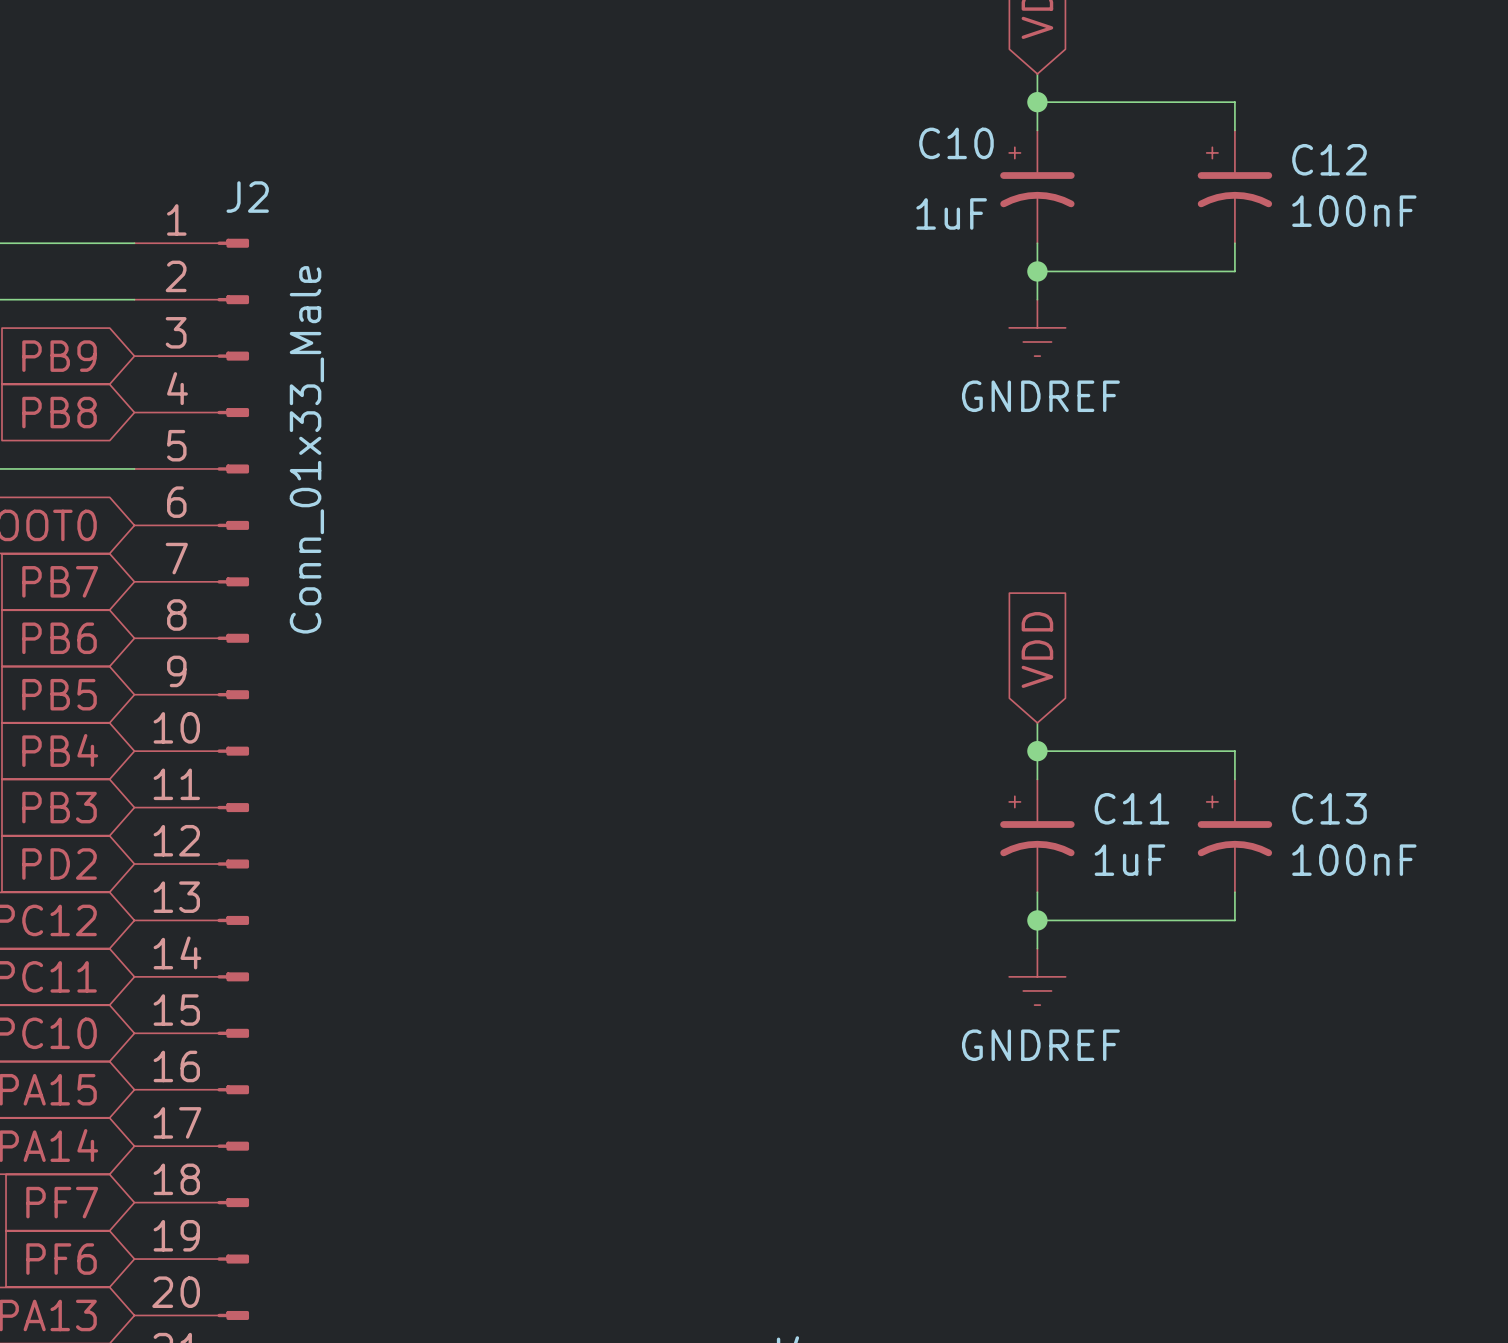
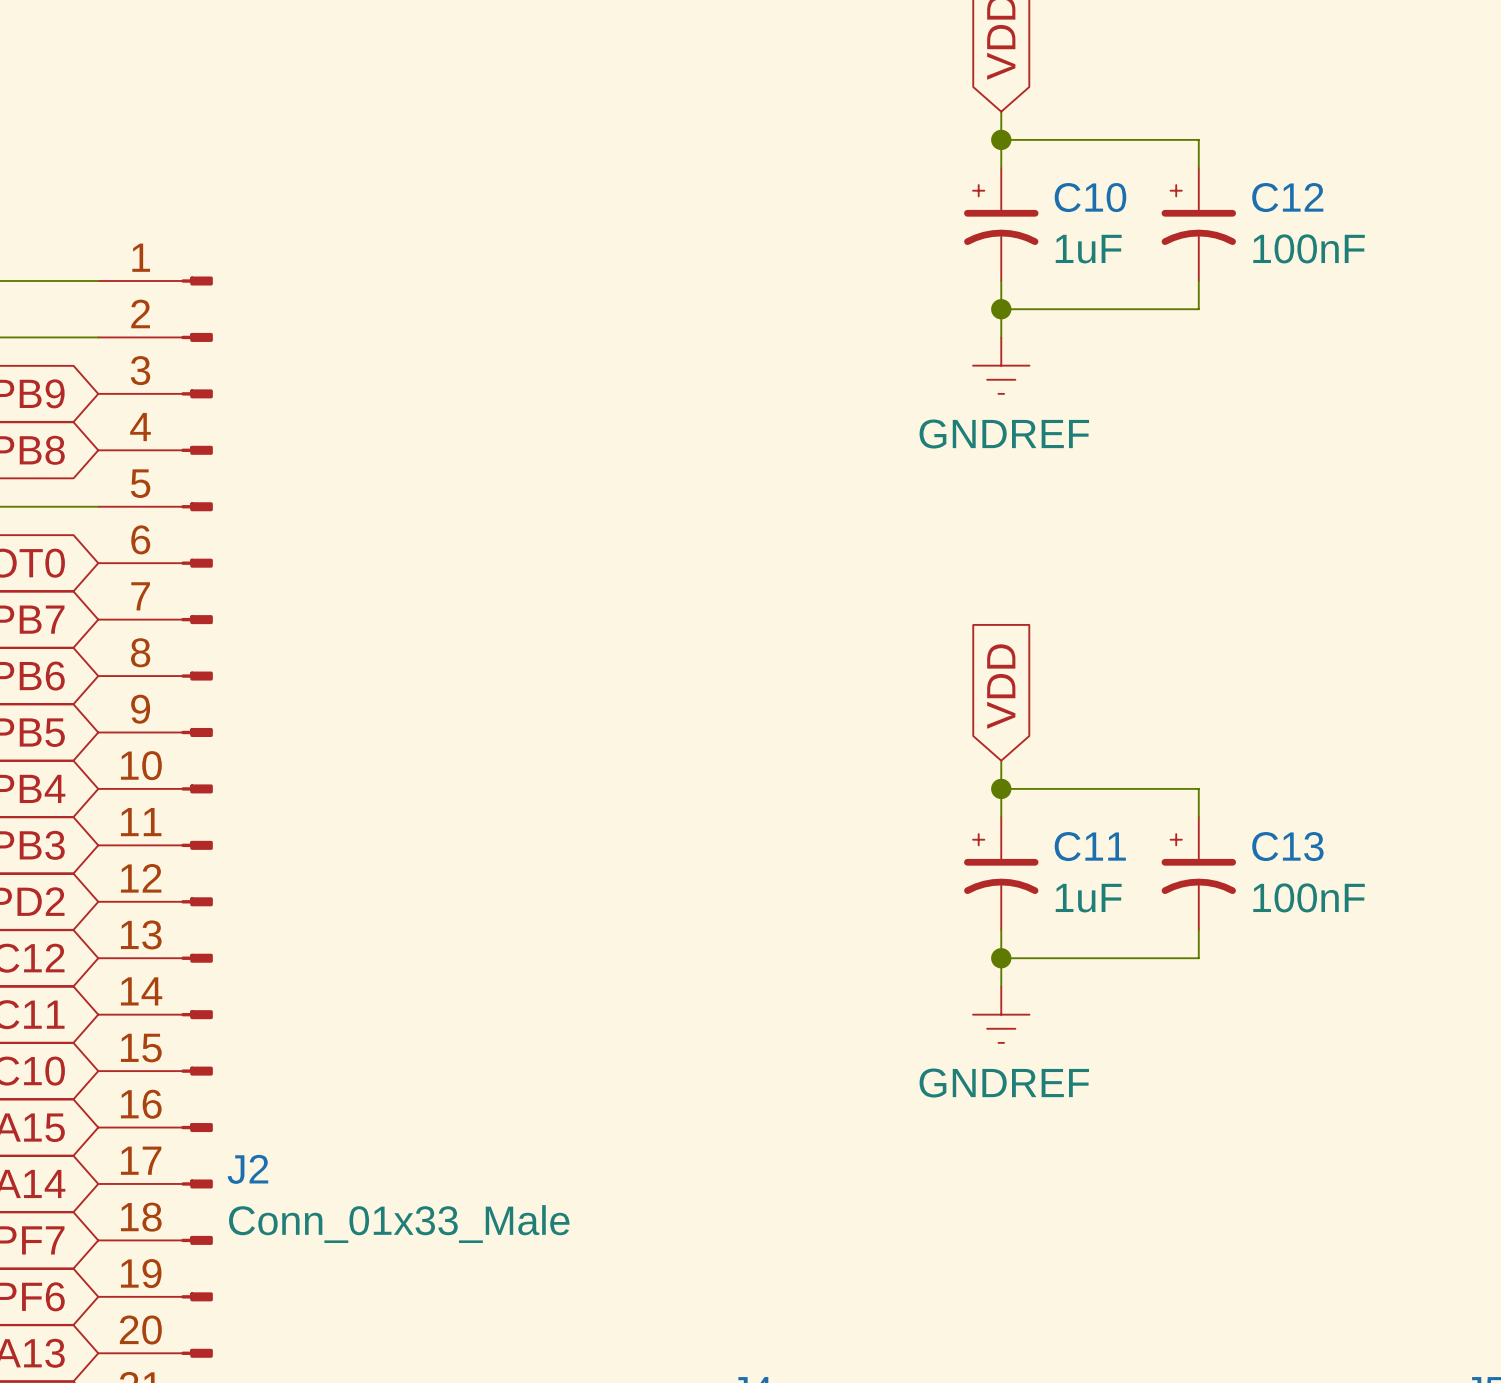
C10 name position: C10 (956, 143) -> C10 (1090, 197)
J2 name position: J2 (247, 197) -> J2 (247, 1169)
C10 value position: 1uF (951, 213) -> 1uF (1088, 249)
J2 value rotation: 0° (306, 449) -> 90° clockwise (399, 1224)
J2 value position: Conn_01x33_Male (306, 449) -> Conn_01x33_Male (399, 1224)

